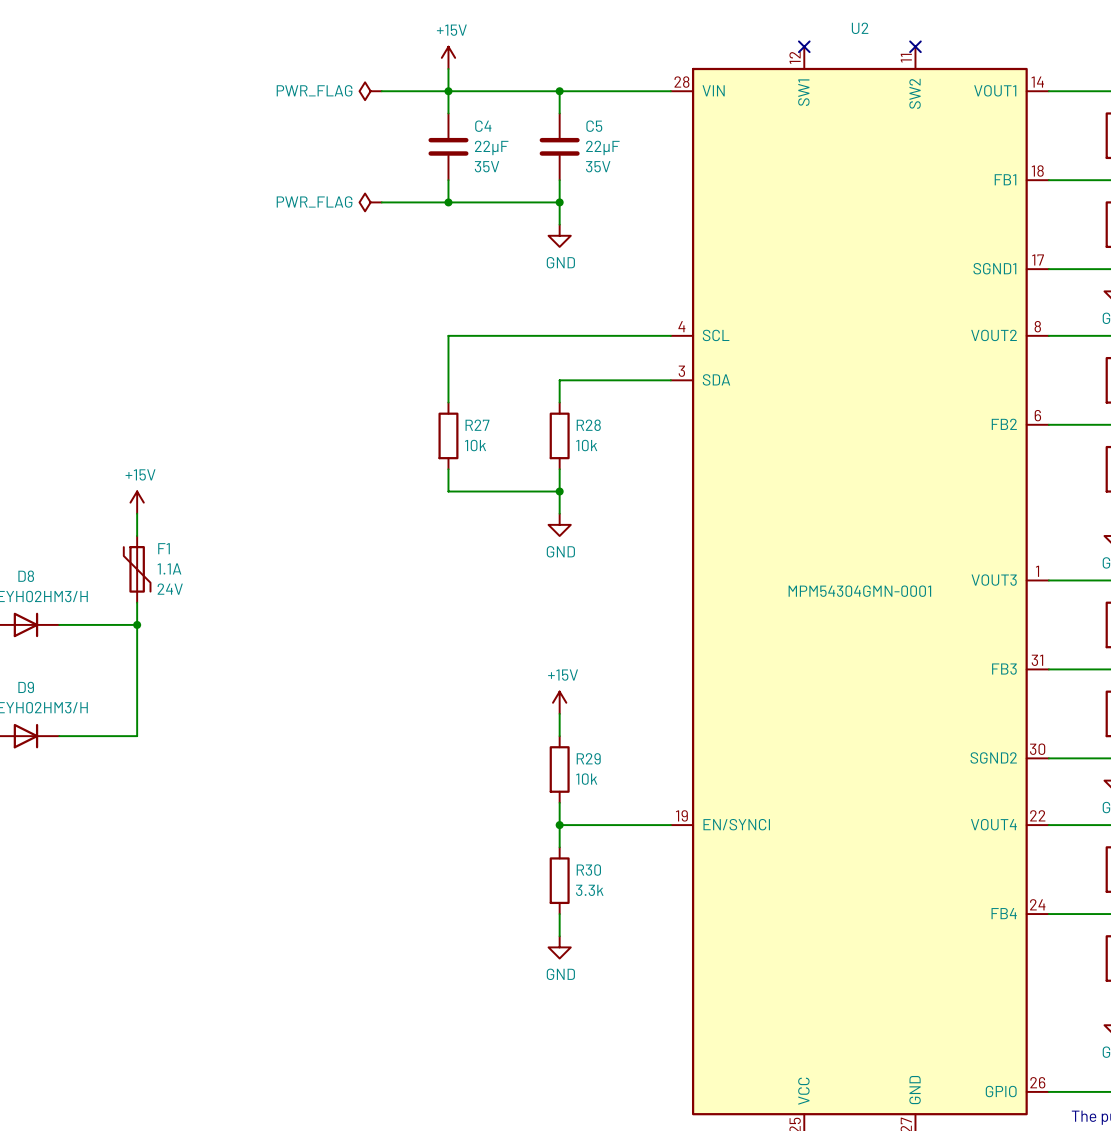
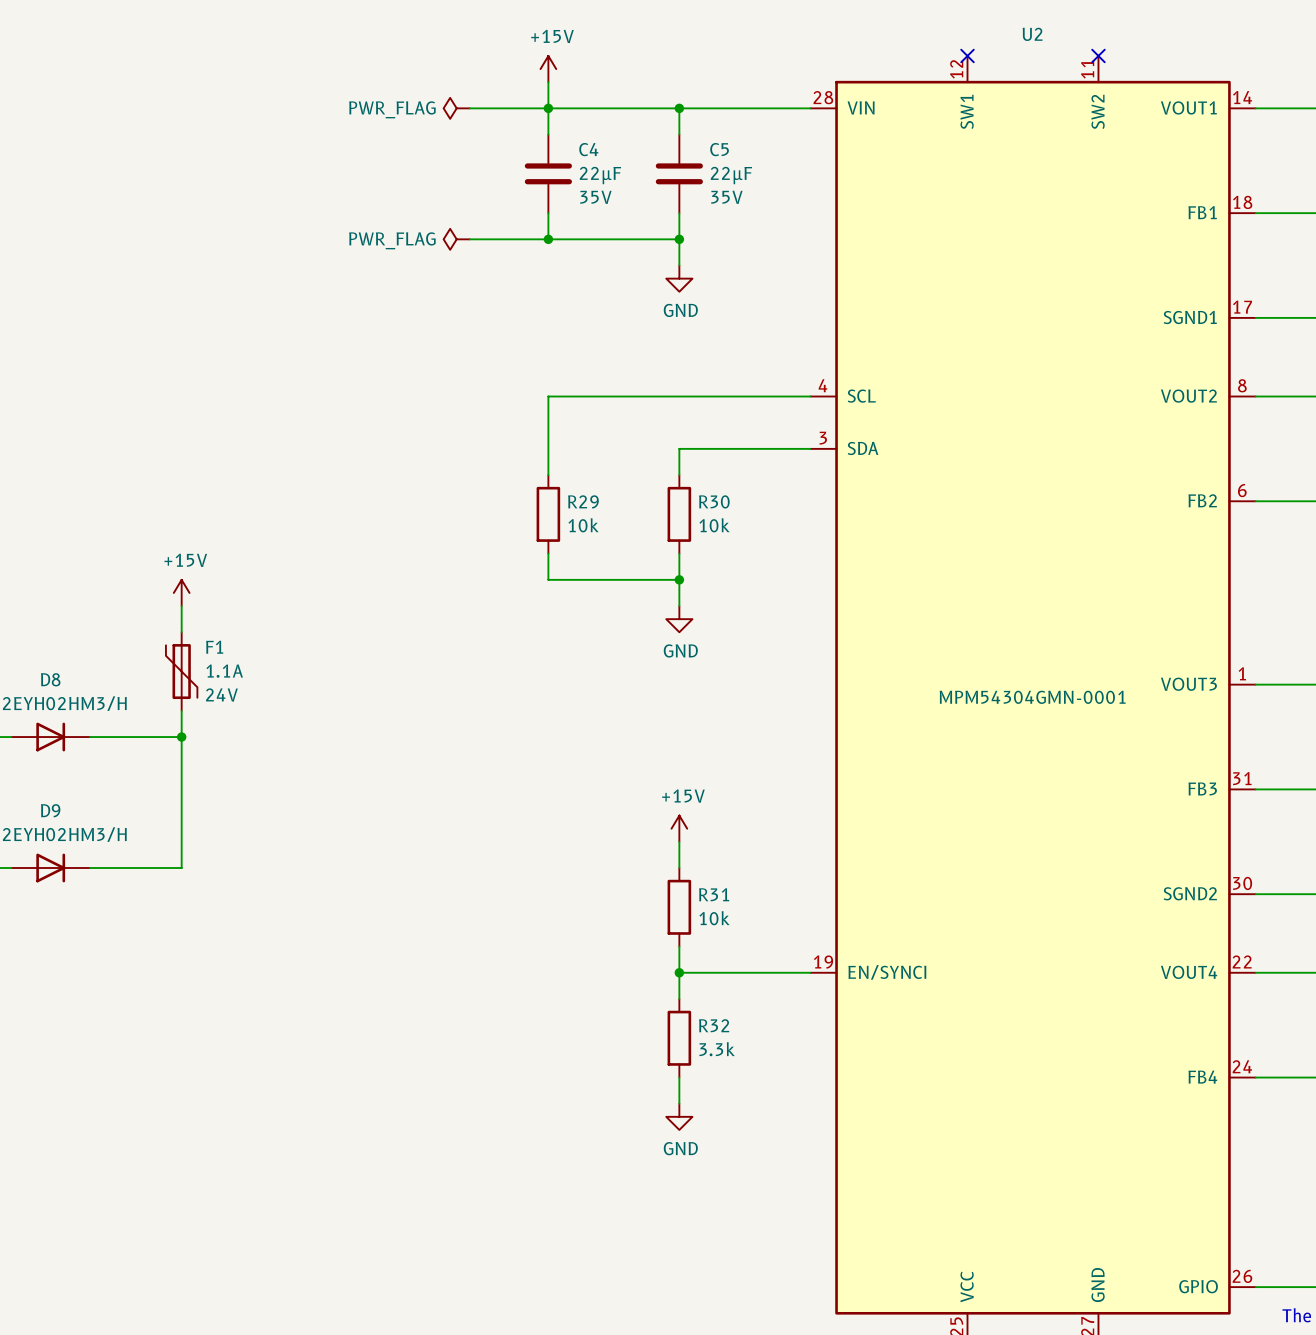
R27 name: R27 (477, 425) -> R29 (583, 501)
R28 name: R28 (588, 425) -> R30 (714, 501)
R29 name: R29 (588, 758) -> R31 (714, 894)
R30 name: R30 (588, 870) -> R32 (714, 1025)

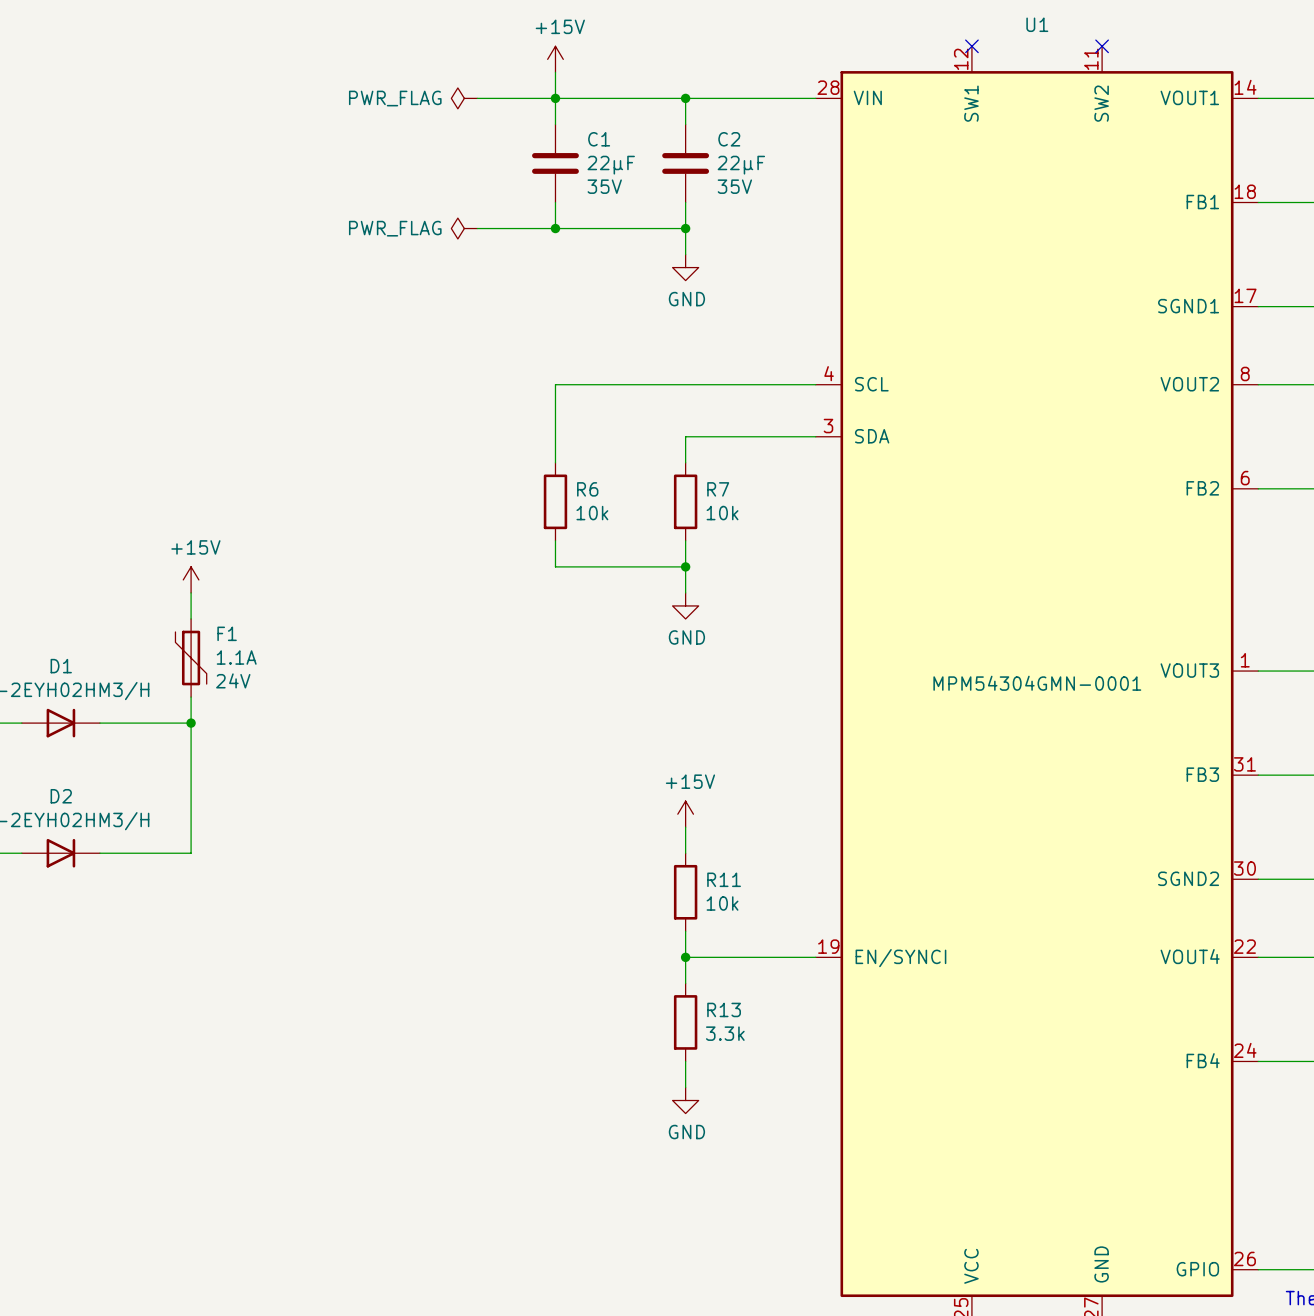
U2 name: U2 (1032, 34) -> U1 (1037, 24)
C4 name: C4 (588, 149) -> C1 (599, 139)
C5 name: C5 (719, 149) -> C2 (729, 139)
R29 name: R29 (583, 501) -> R6 (587, 489)
R30 name: R30 (714, 501) -> R7 (718, 489)
D8 name: D8 (50, 679) -> D1 (61, 666)
D9 name: D9 (50, 810) -> D2 (61, 796)
R31 name: R31 (714, 894) -> R11 (724, 879)
R32 name: R32 (714, 1025) -> R13 (724, 1009)

